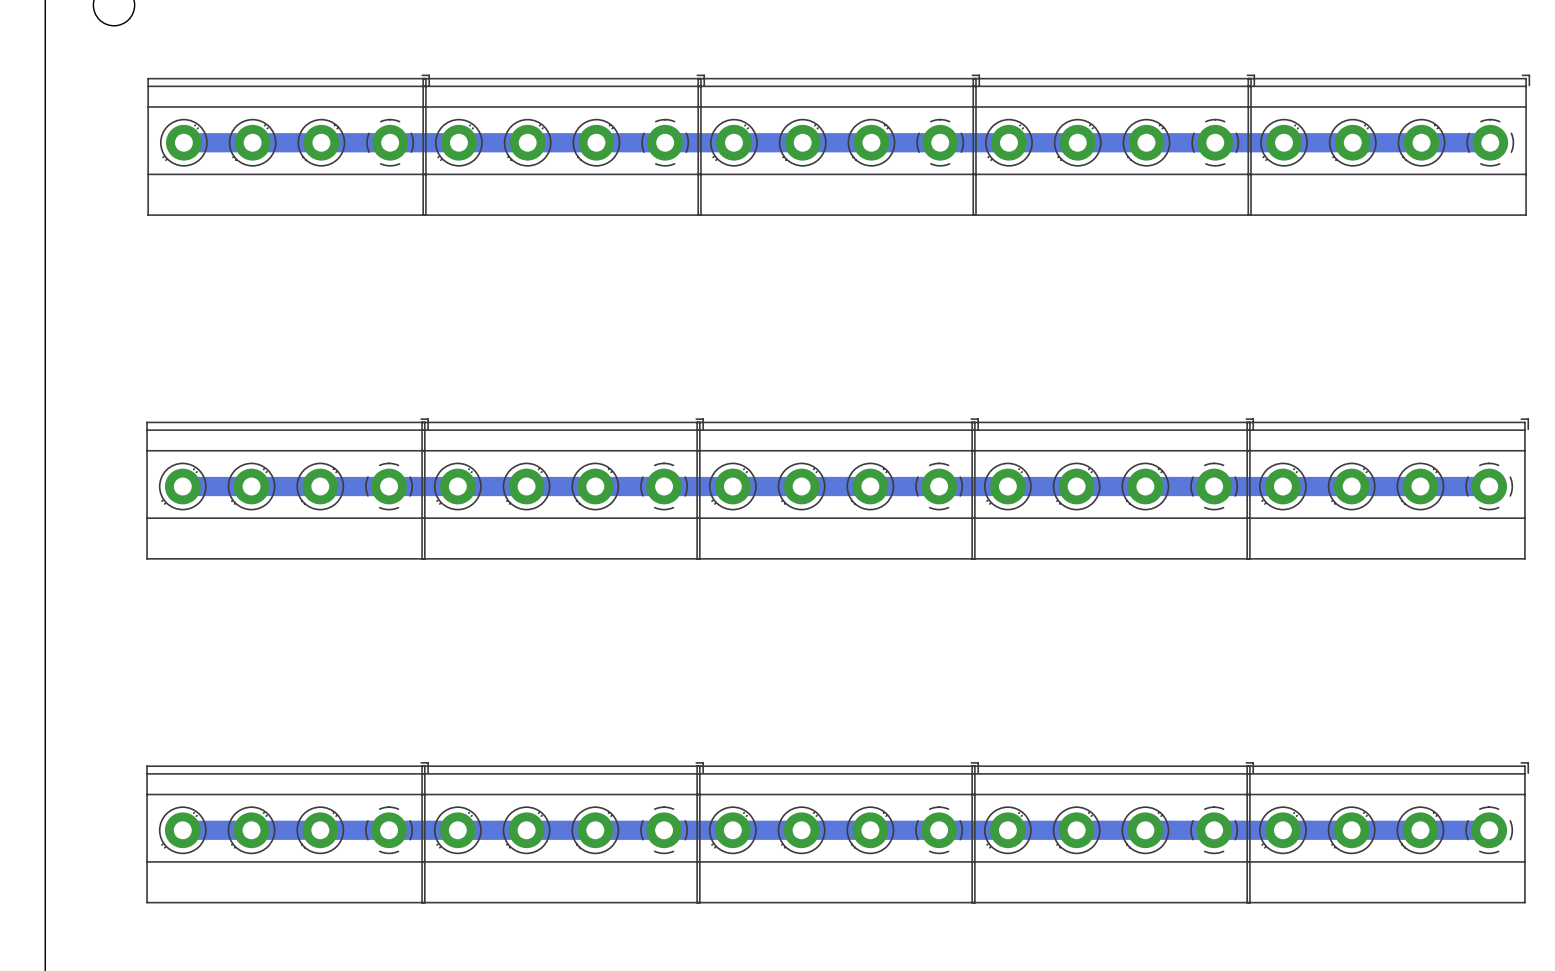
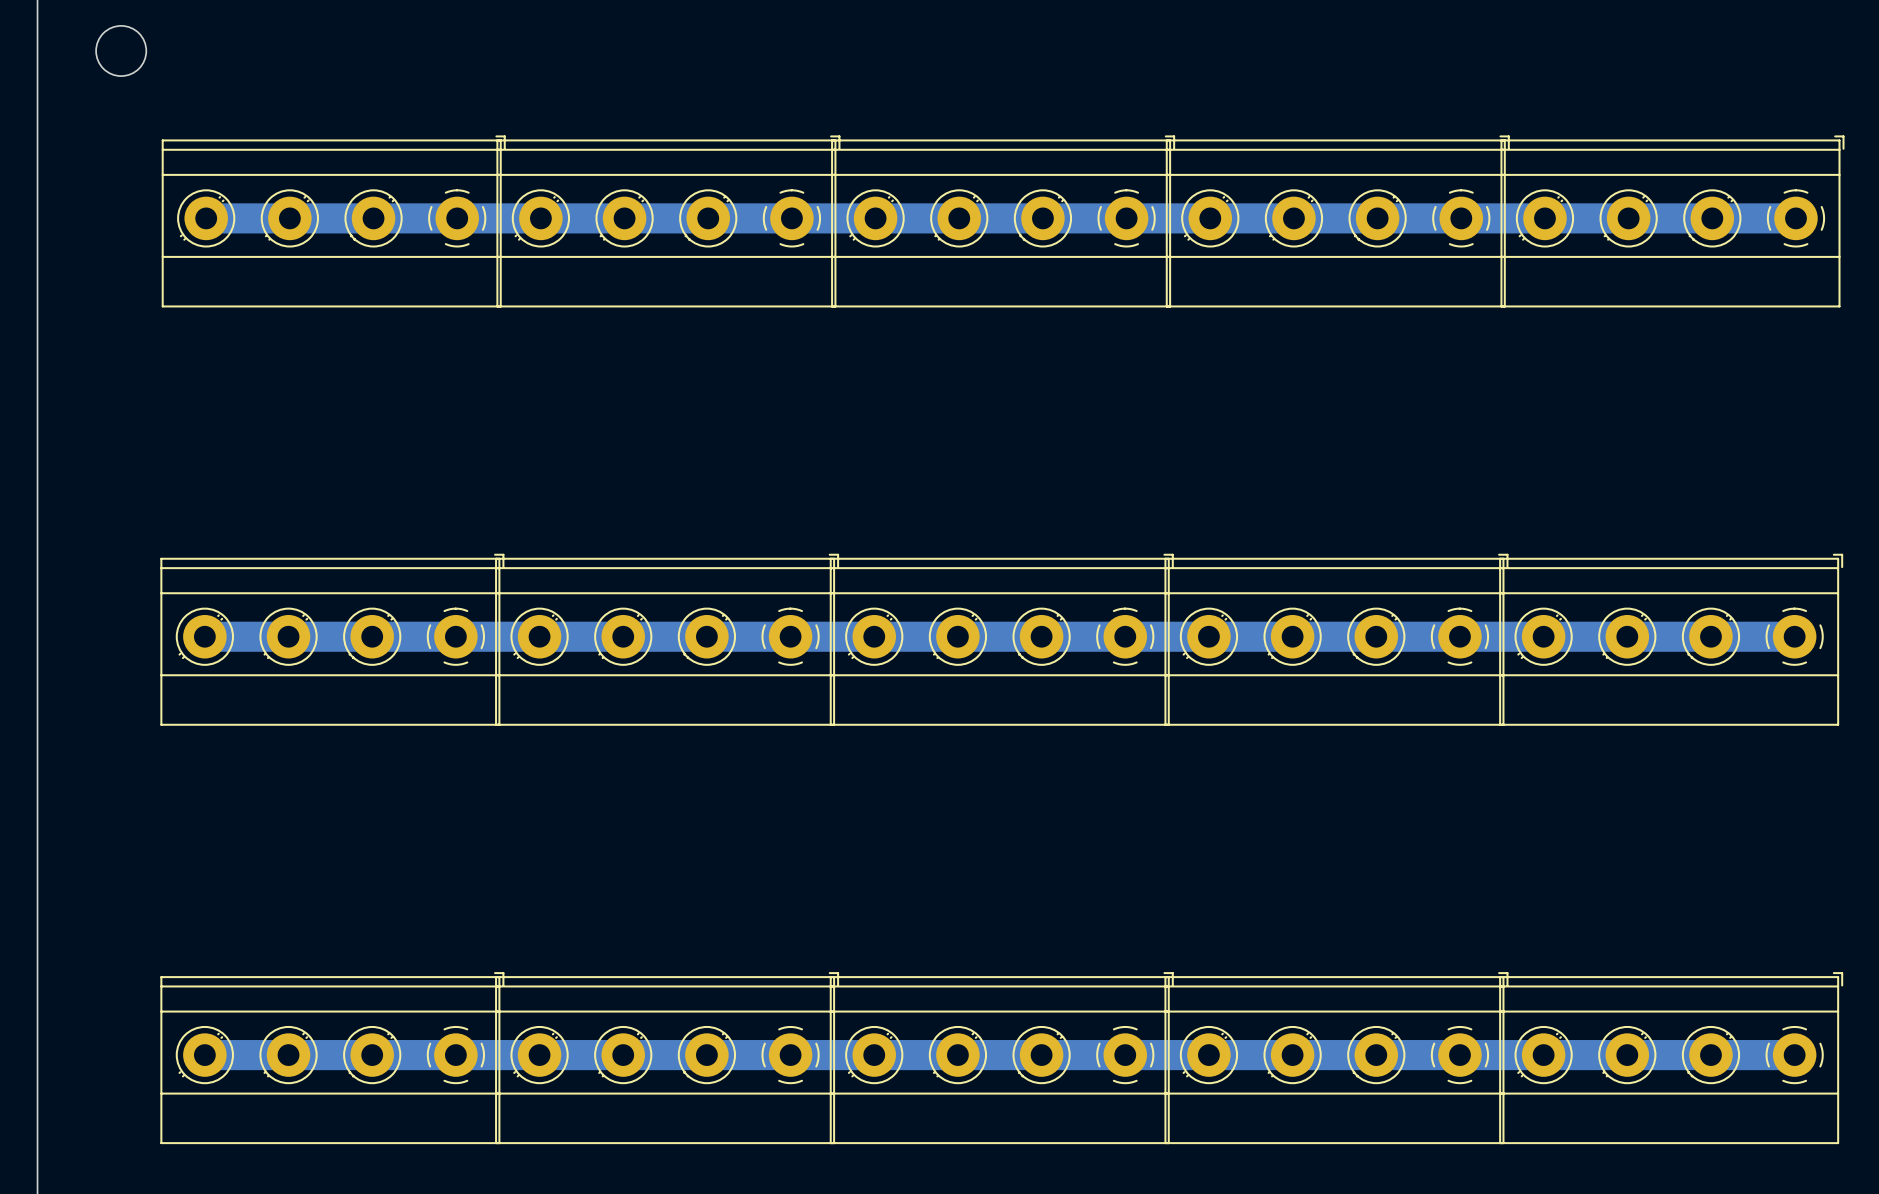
bottom track width: thin (183, 142) (1490, 142) -> thick (206, 218) (1795, 218)
bottom track width: thin (182, 486) (1489, 486) -> thick (204, 636) (1794, 636)
bottom track width: thin (182, 830) (1489, 830) -> thick (204, 1055) (1794, 1055)

